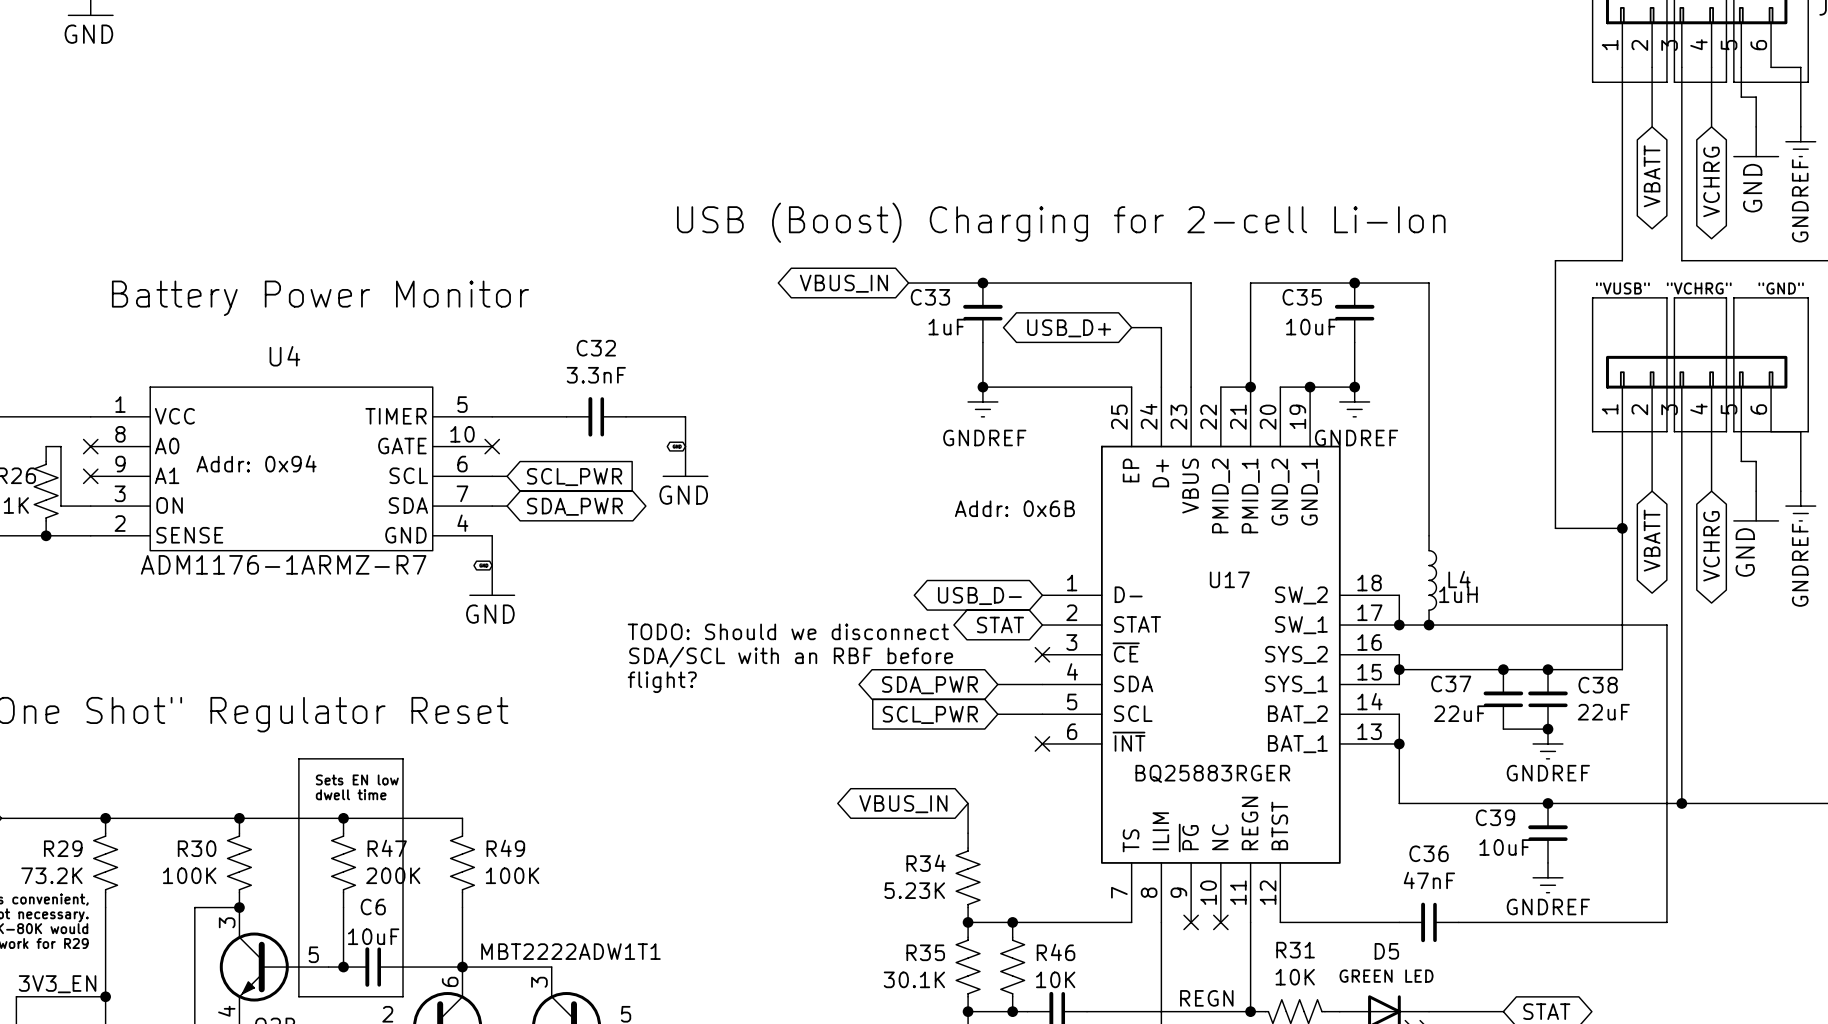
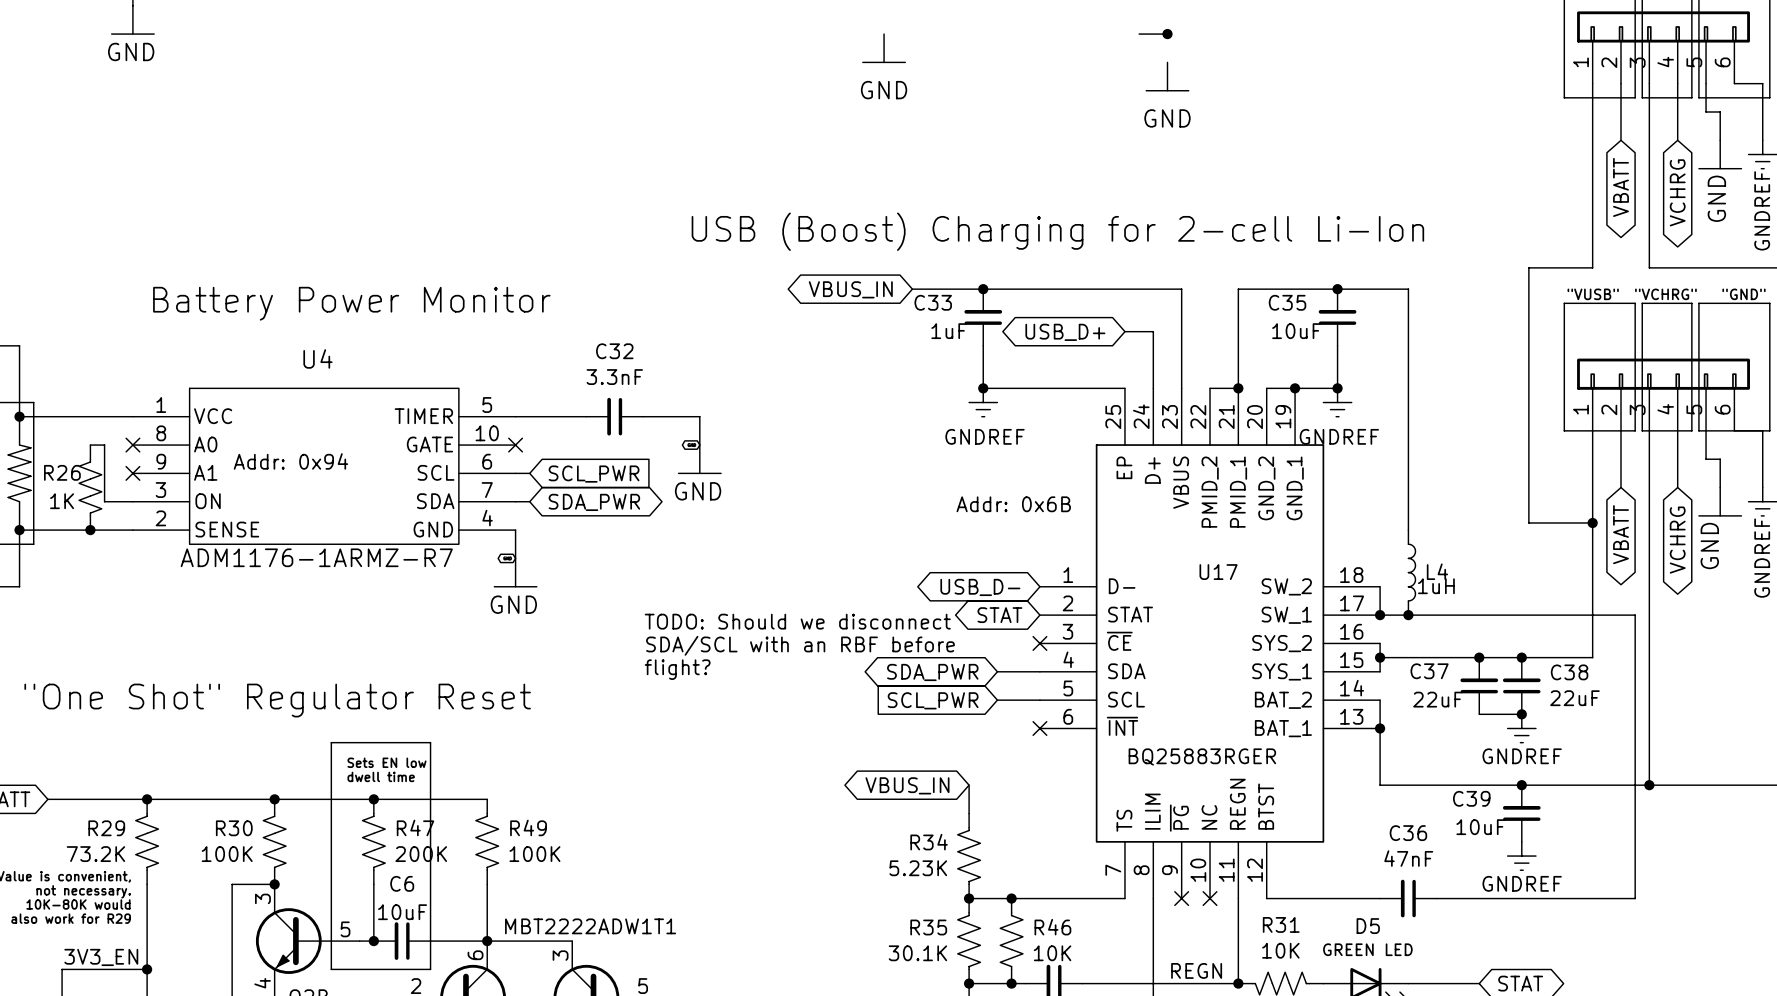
wire: none -> (1139, 34) (1167, 34)
junction: none -> (1167, 34)
power symbol: none -> GND (884, 48)
power symbol: none -> GND (1167, 76)

